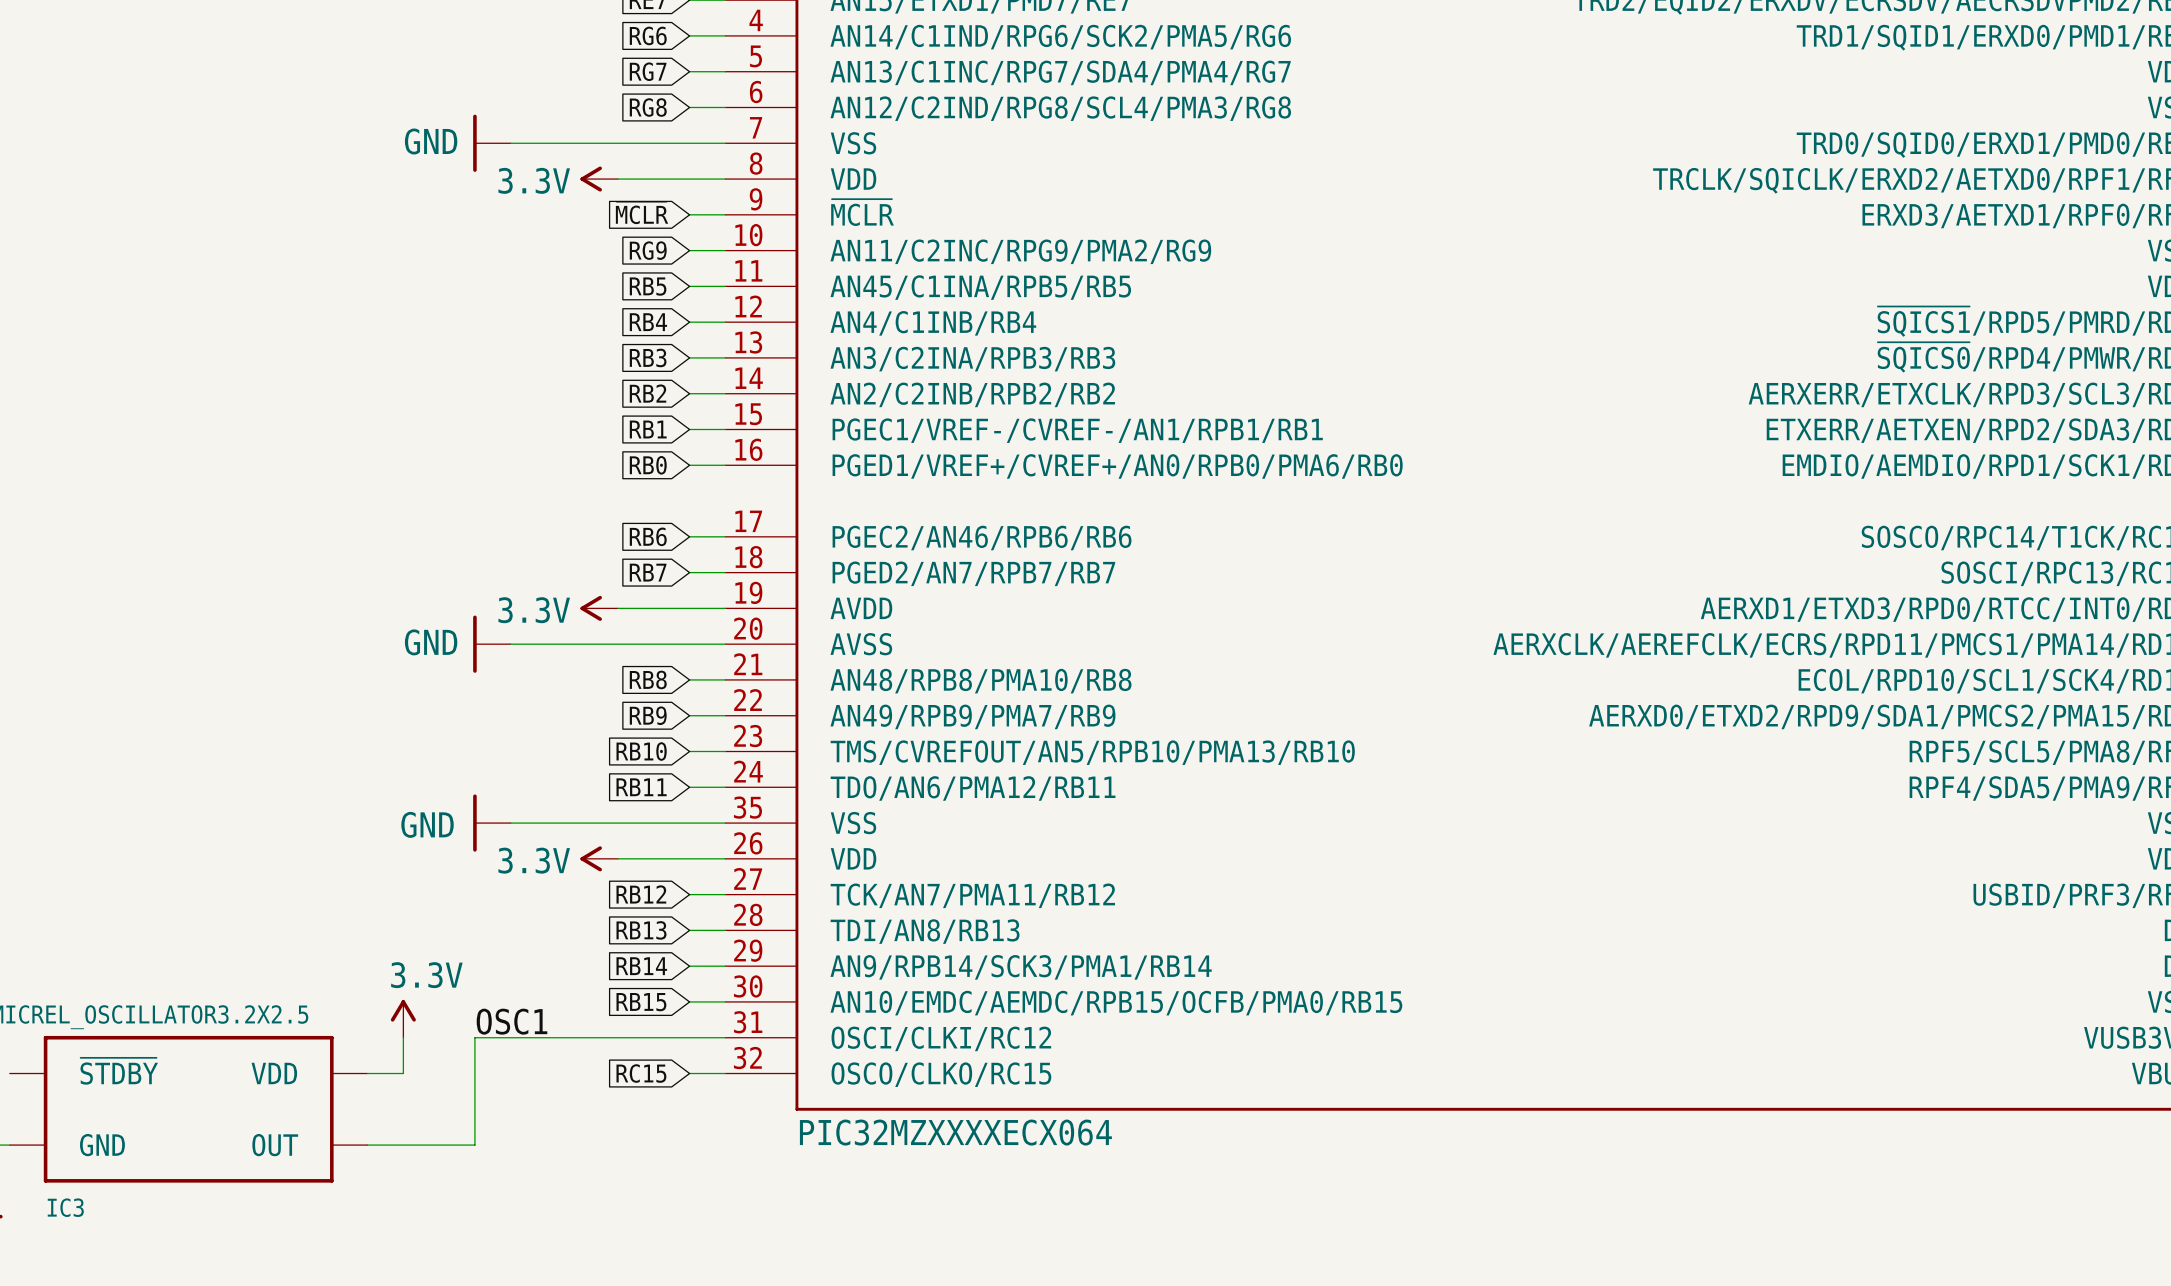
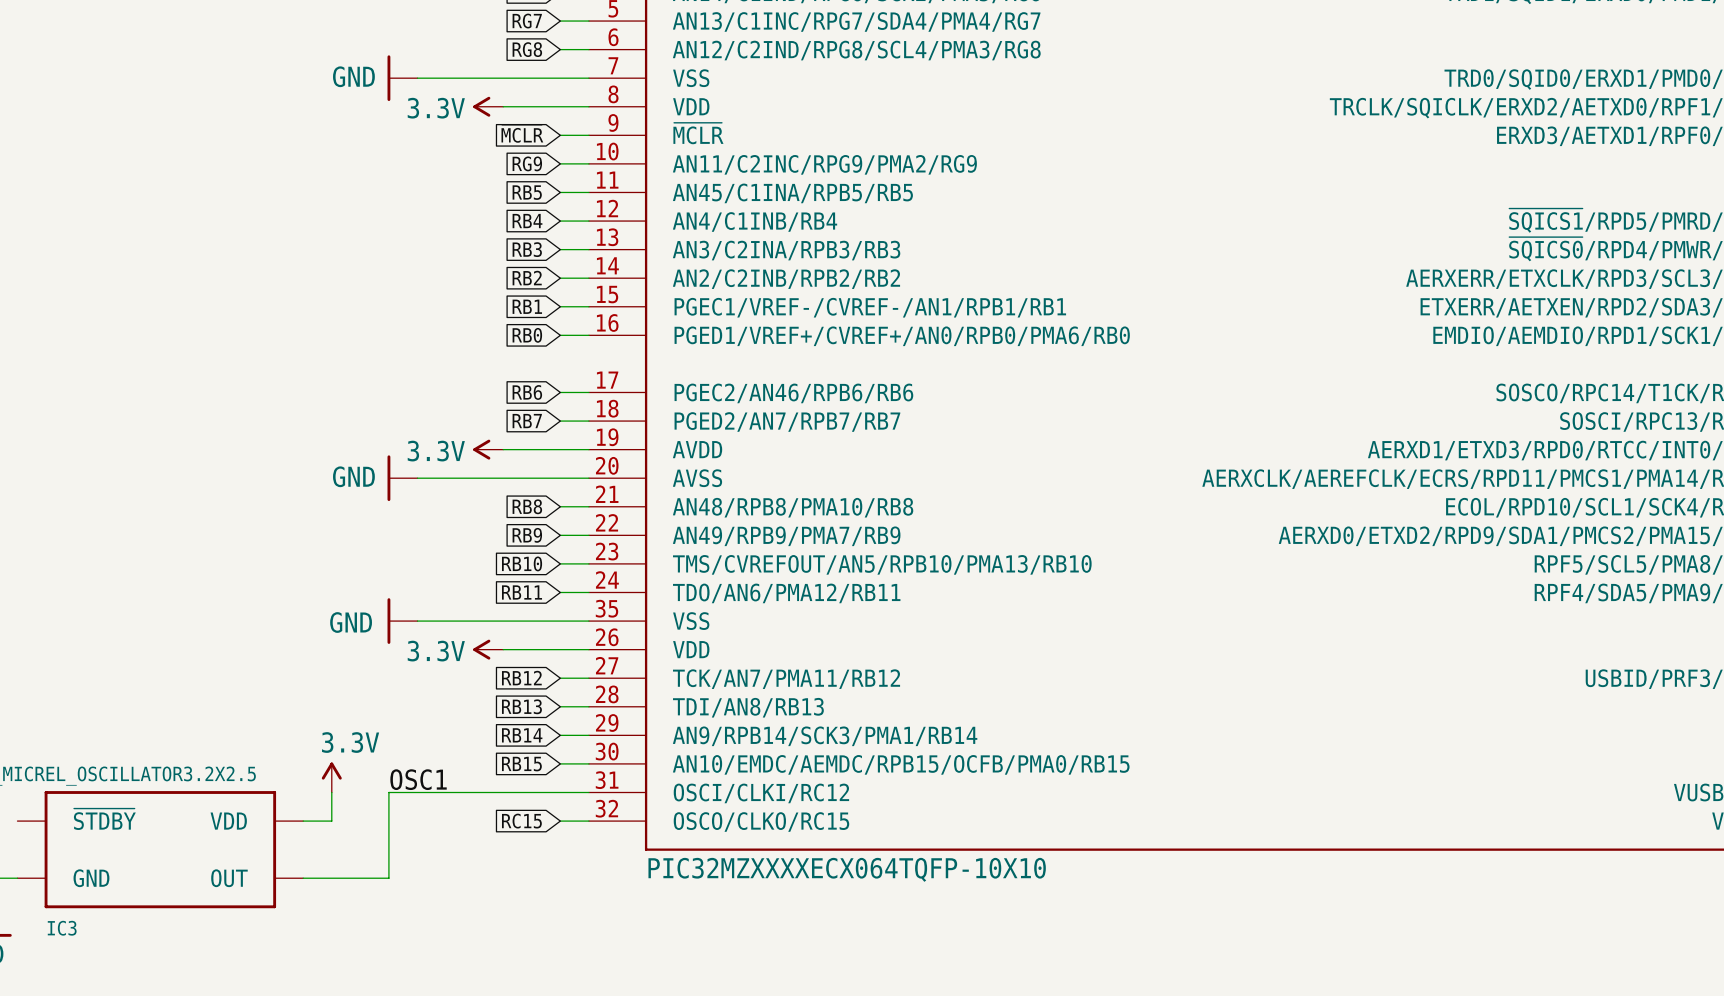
part value: PIC32MZXXXXECX064 (955, 1132) -> PIC32MZXXXXECX064TQFP-10X10 (847, 869)

